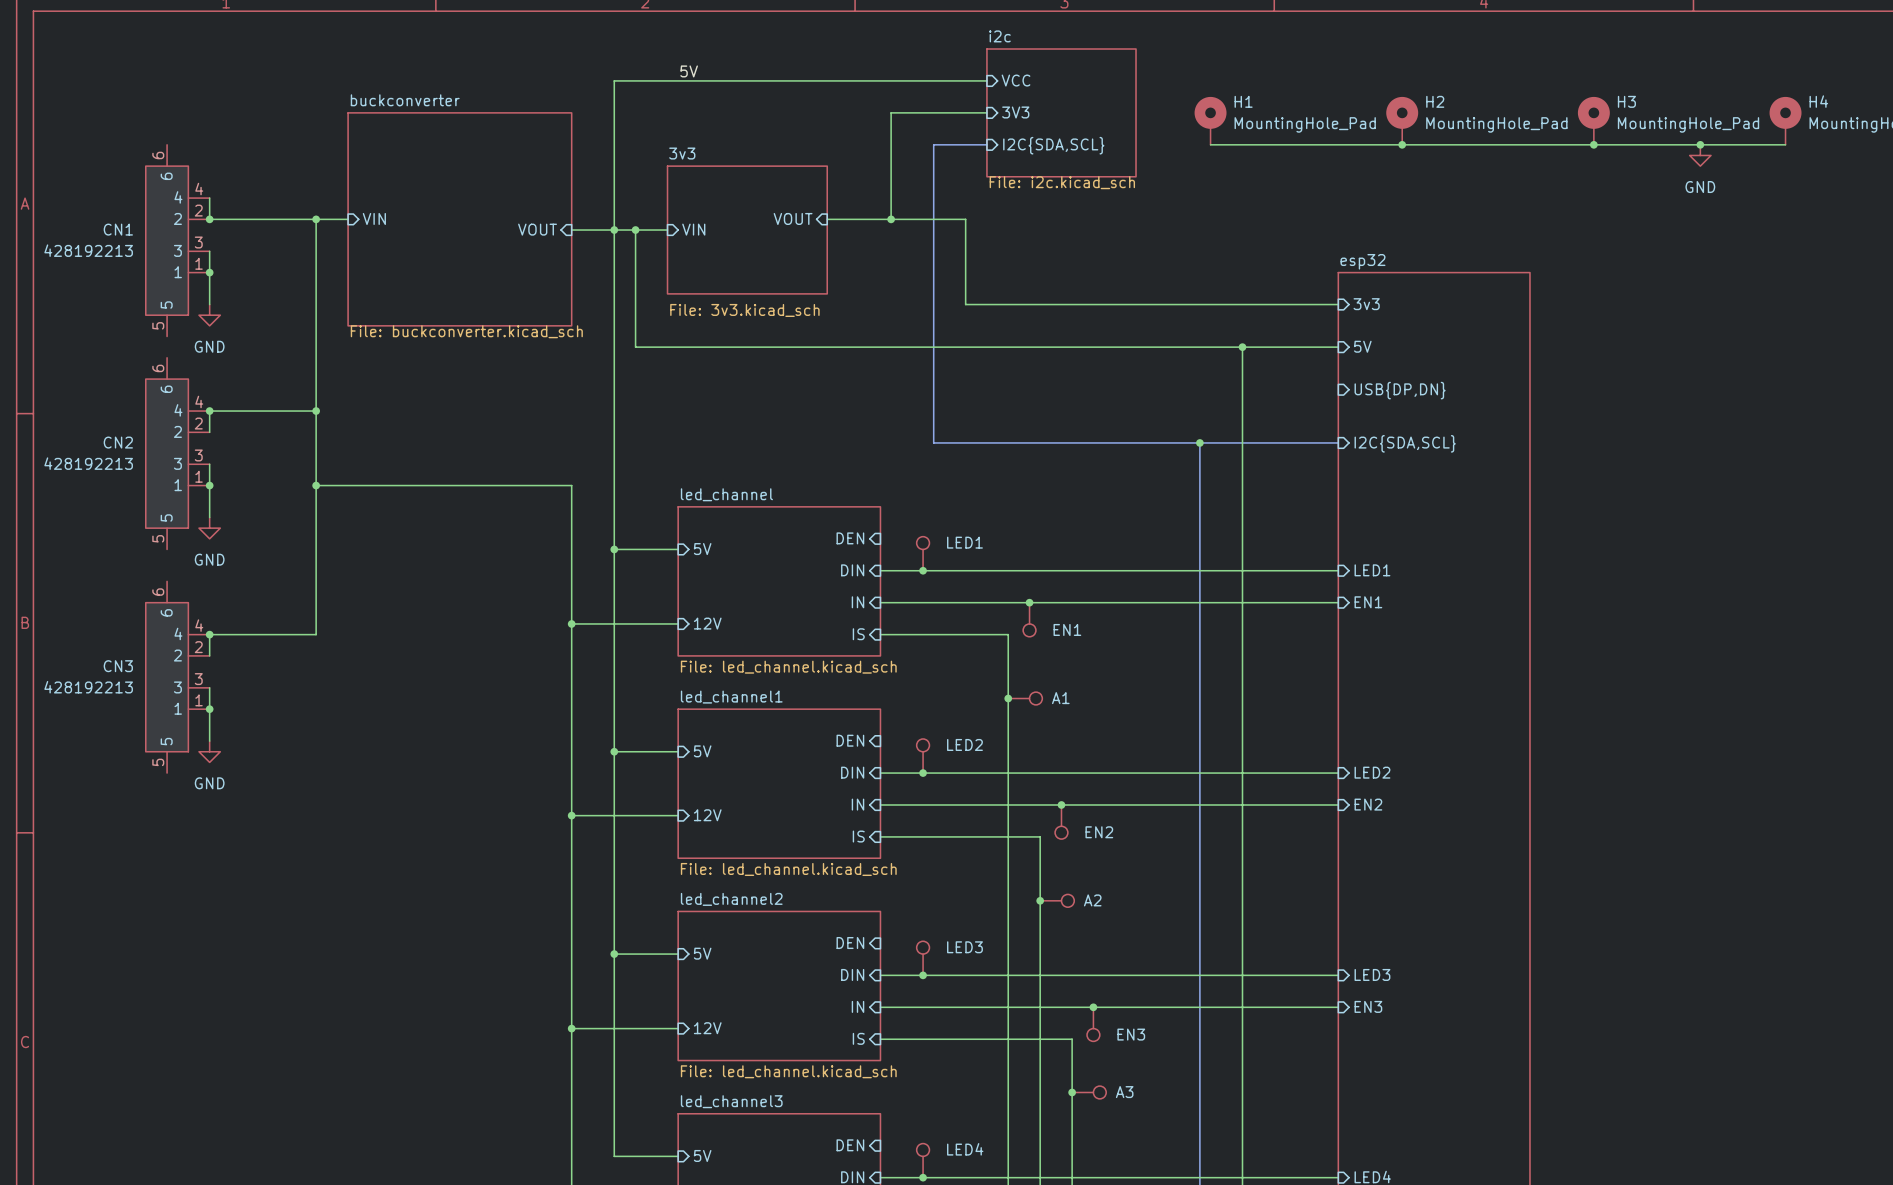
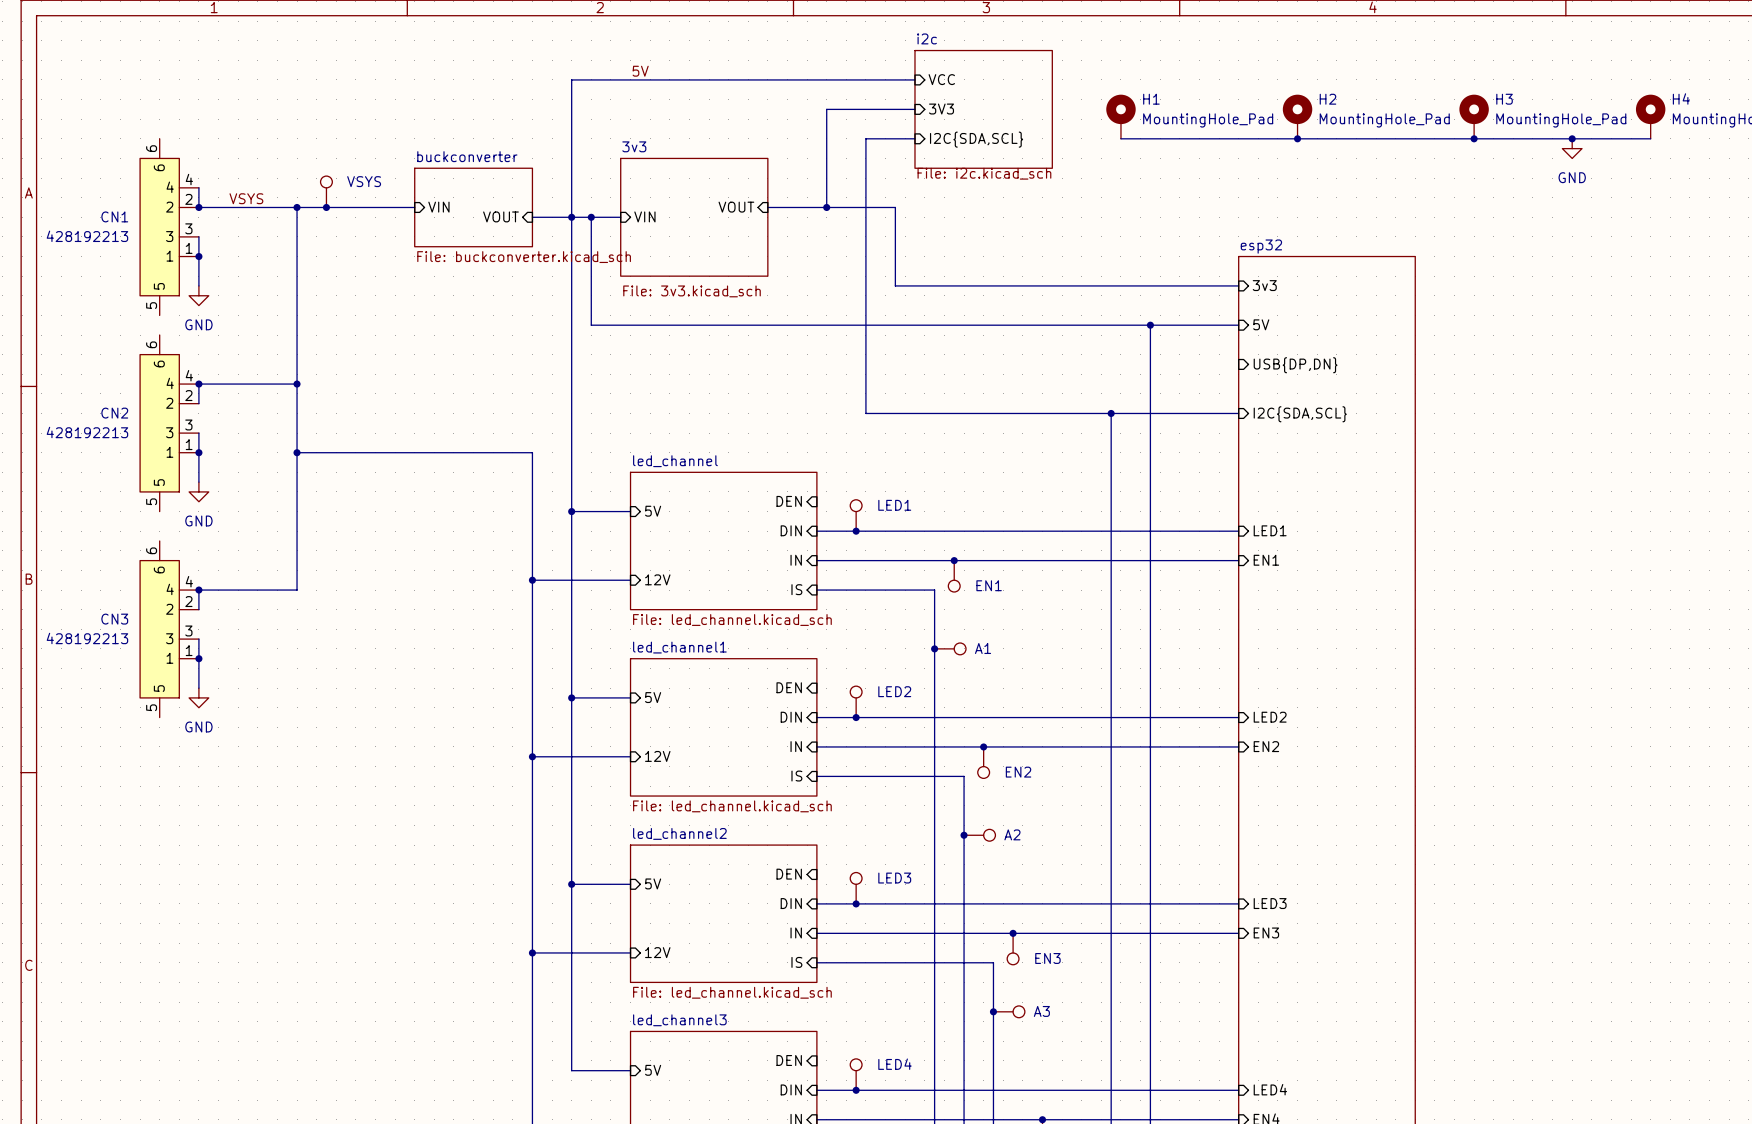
part: none -> (326, 191)
label: none -> VSYS (246, 198)
sheet pin position: VIN (374, 218) -> VIN (438, 207)
wire: none -> (326, 207) (414, 207)
junction: none -> (326, 207)
sheet buckconverter: File: buckconverter.kicad_sch (459, 219) -> none
sheet buckconverter: none -> File: buckconverter.kicad_sch (473, 207)

